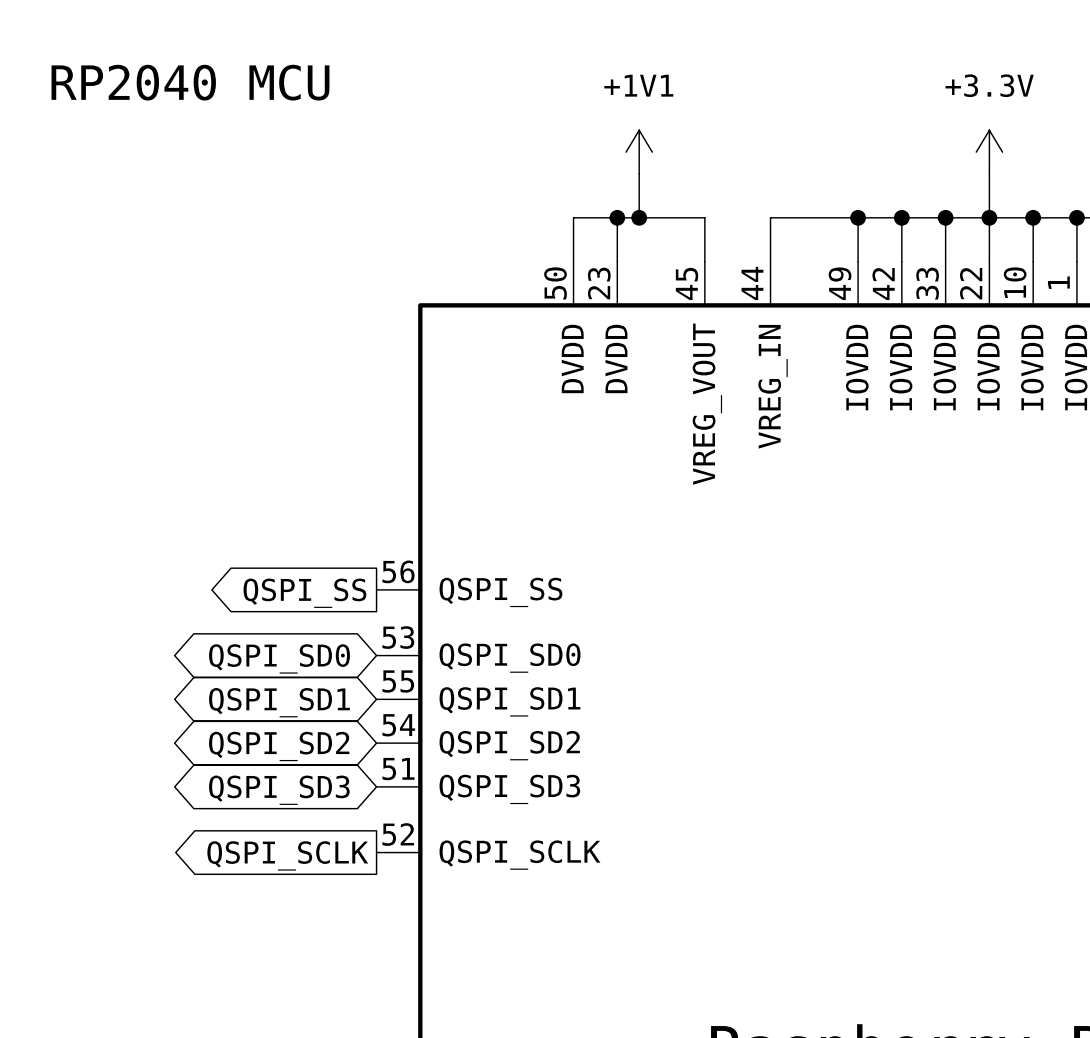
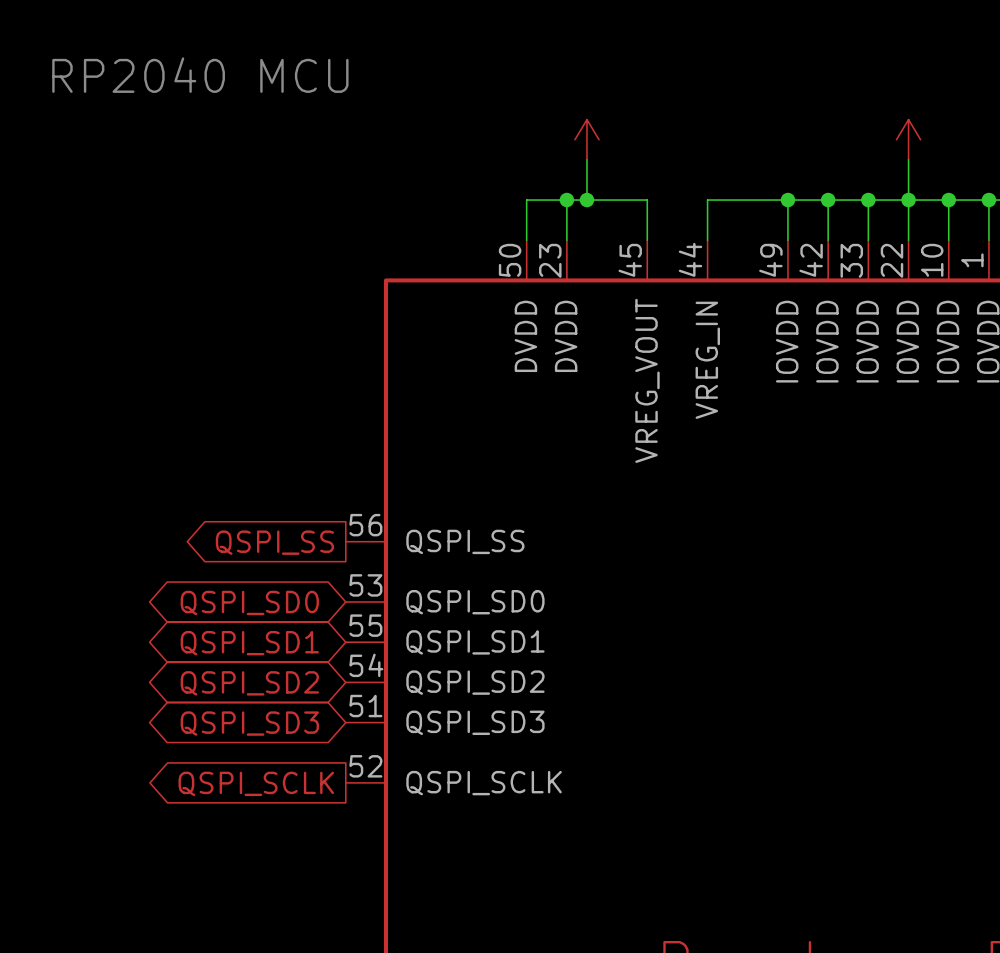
power symbol text: +1V1 (638, 85) -> none
power symbol text: +3.3V (989, 85) -> none

